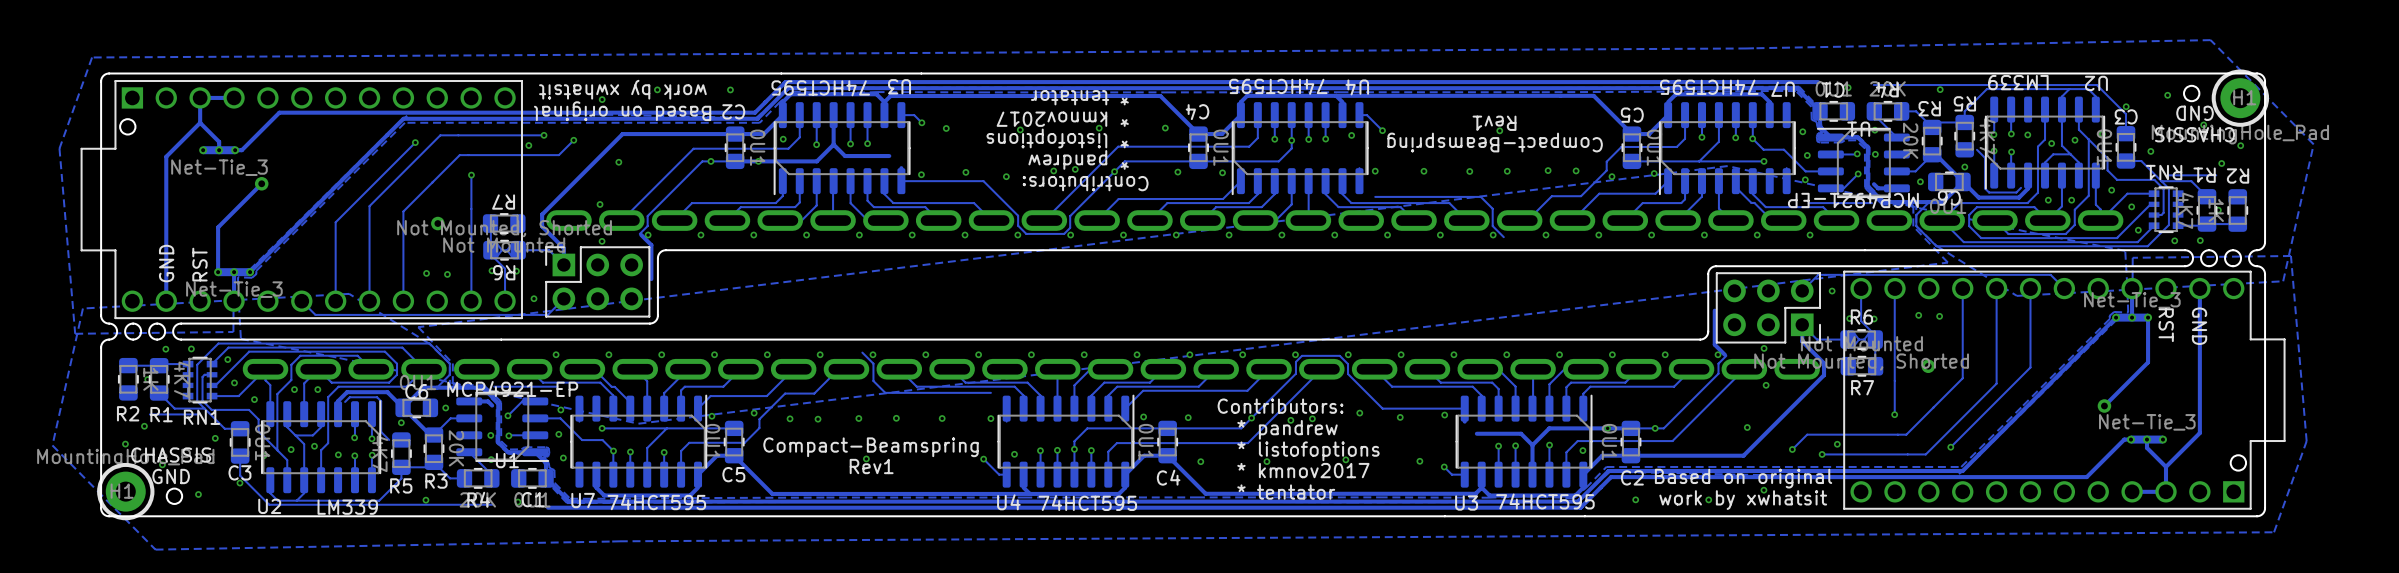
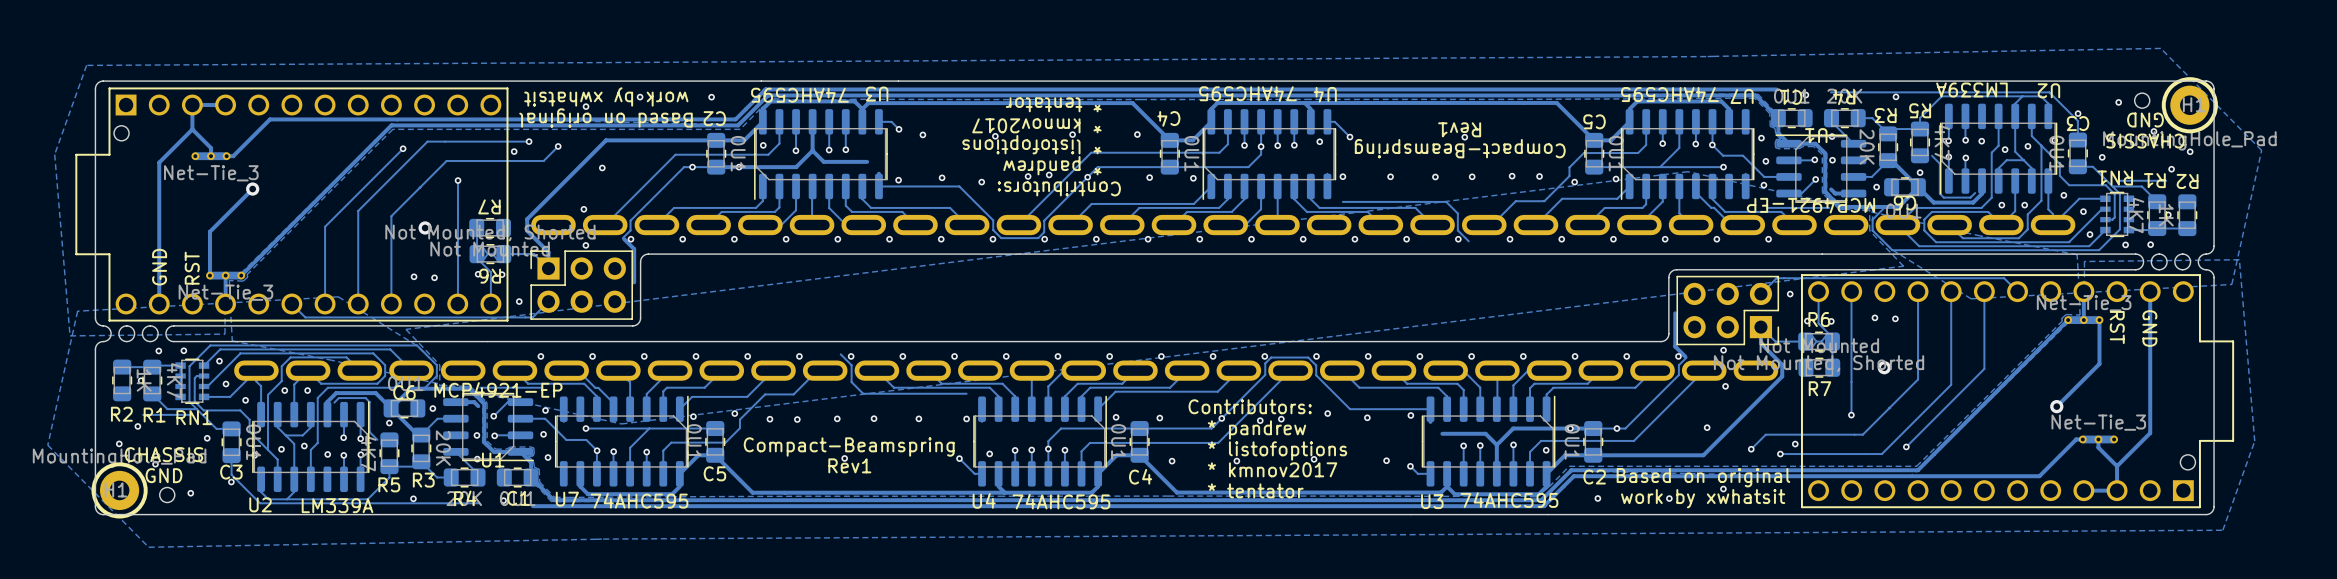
U2 value: LM339 (2018, 82) -> LM339A (1971, 90)
U4 value: 74HCT595 (1278, 86) -> 74AHC595 (1248, 94)
U7 value: 74HCT595 (1709, 87) -> 74AHC595 (1669, 94)
U3 value: 74HCT595 (820, 88) -> 74AHC595 (799, 95)
U3 value: 74HCT595 (1545, 501) -> 74AHC595 (1509, 500)
U7 value: 74HCT595 (656, 502) -> 74AHC595 (639, 500)
U4 value: 74HCT595 (1087, 503) -> 74AHC595 (1061, 501)
U2 value: LM339 (347, 507) -> LM339A (337, 505)

